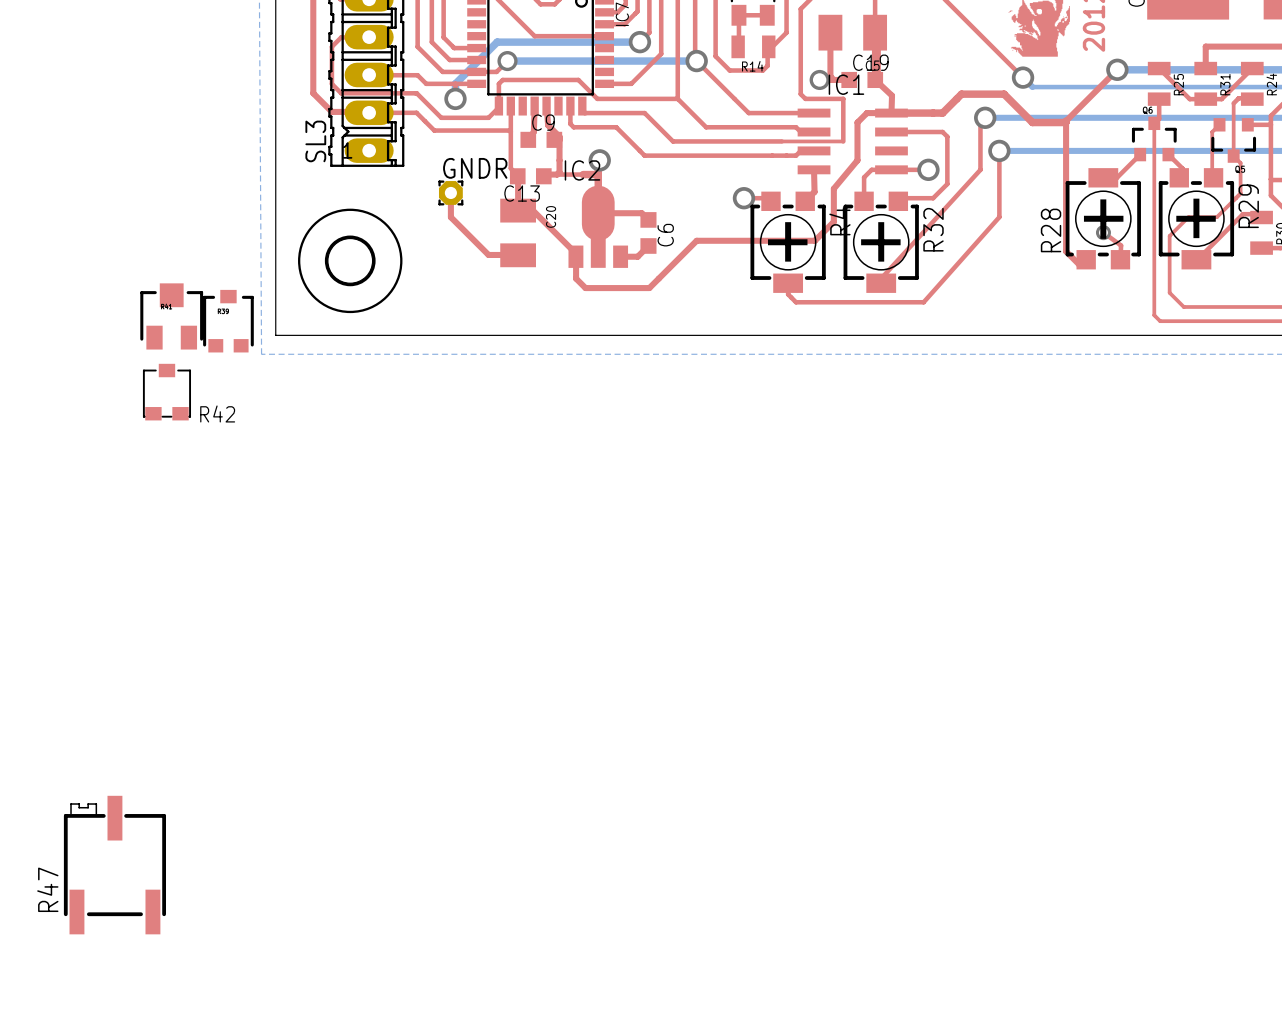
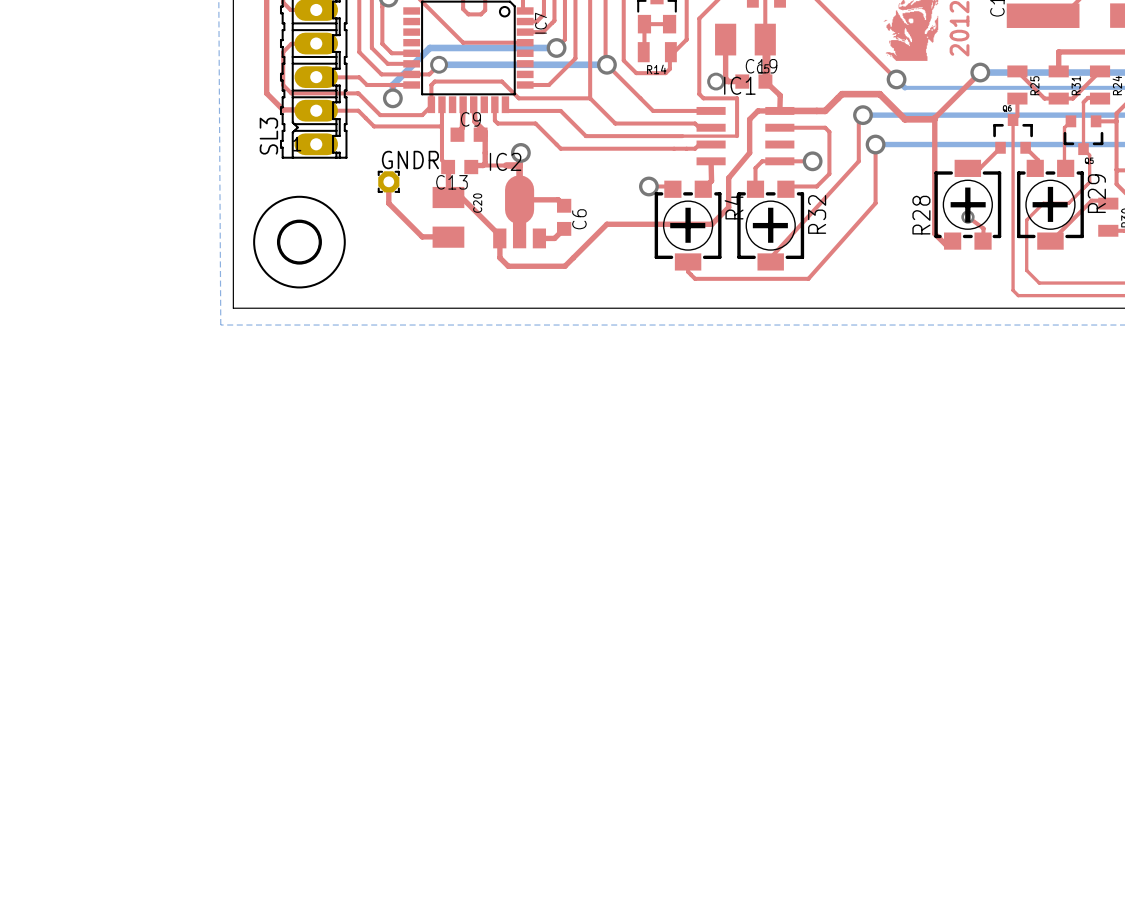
part: (171, 316) -> none
part: (228, 321) -> none
R42: (166, 392) -> none
R47: (114, 865) -> none

